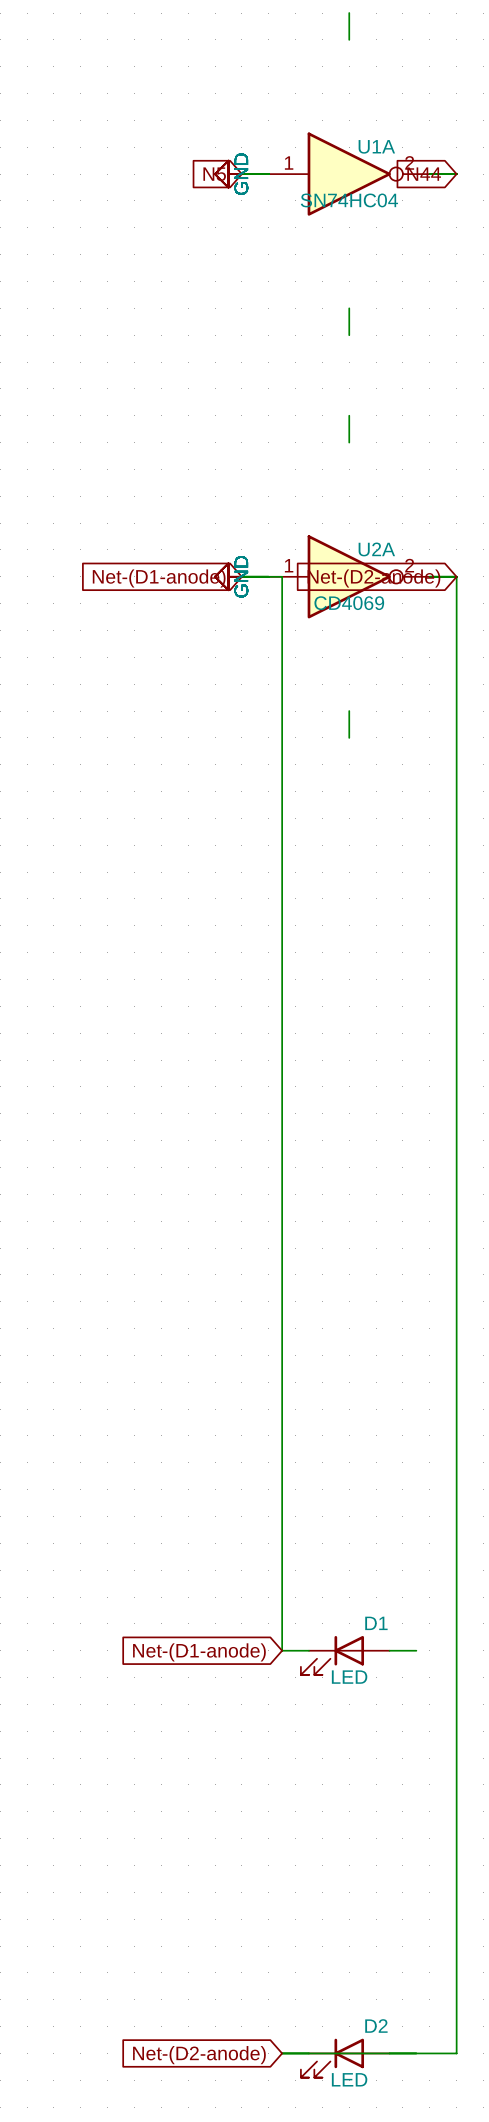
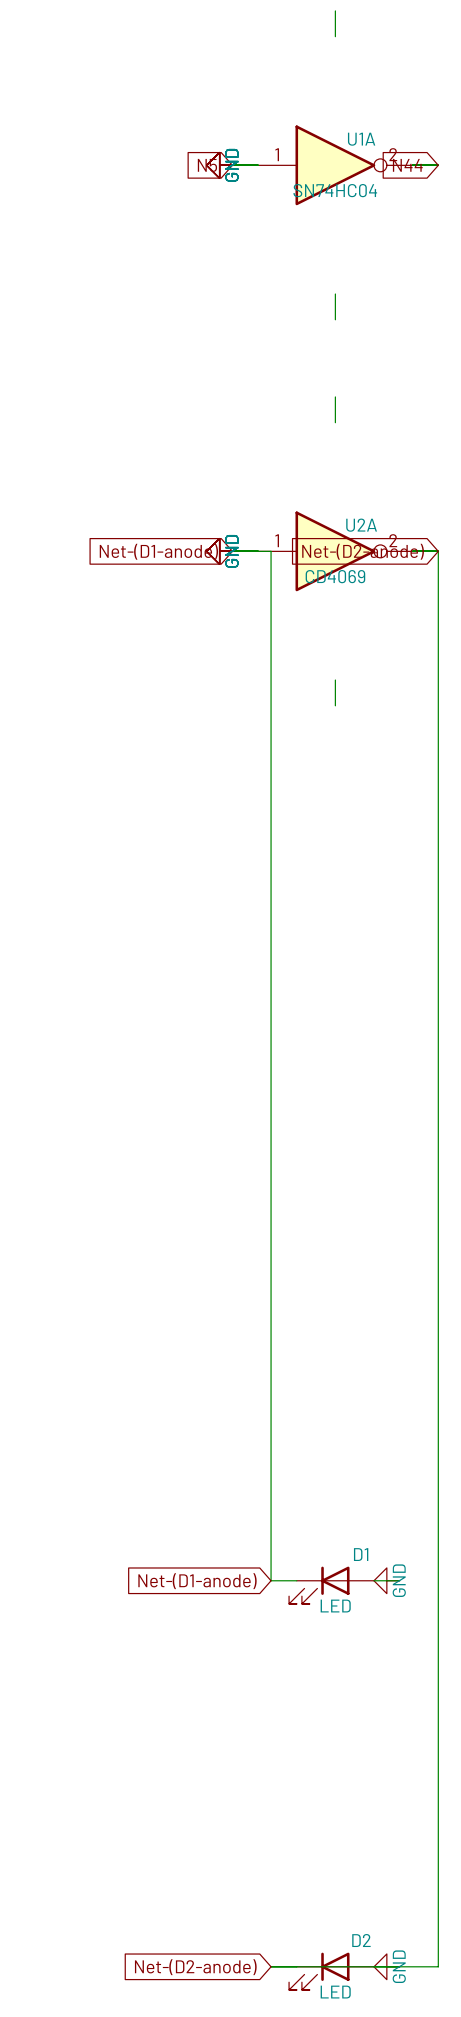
power symbol: none -> GND (386, 1580)
power symbol: none -> GND (386, 1966)

